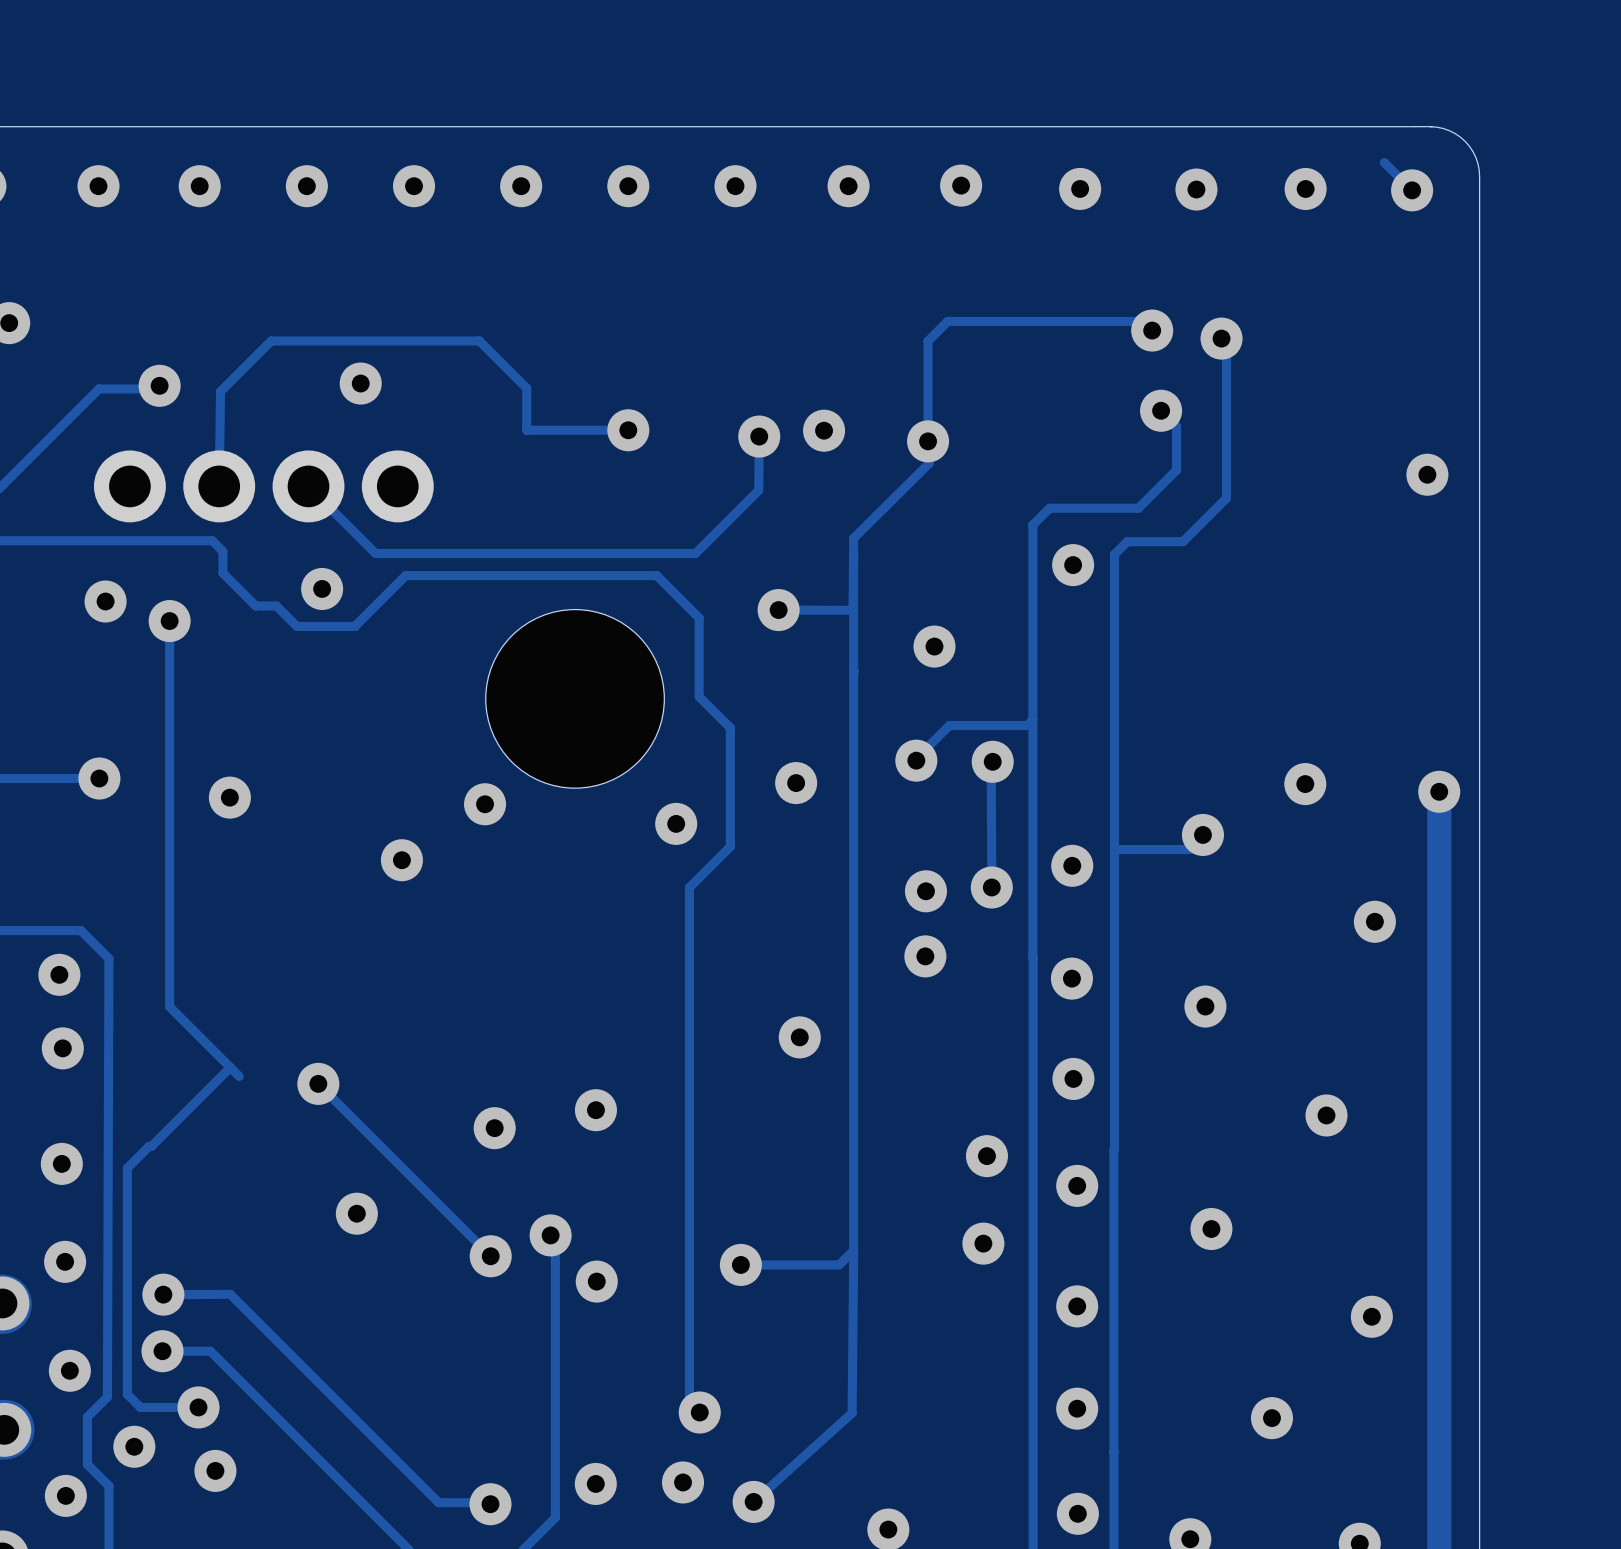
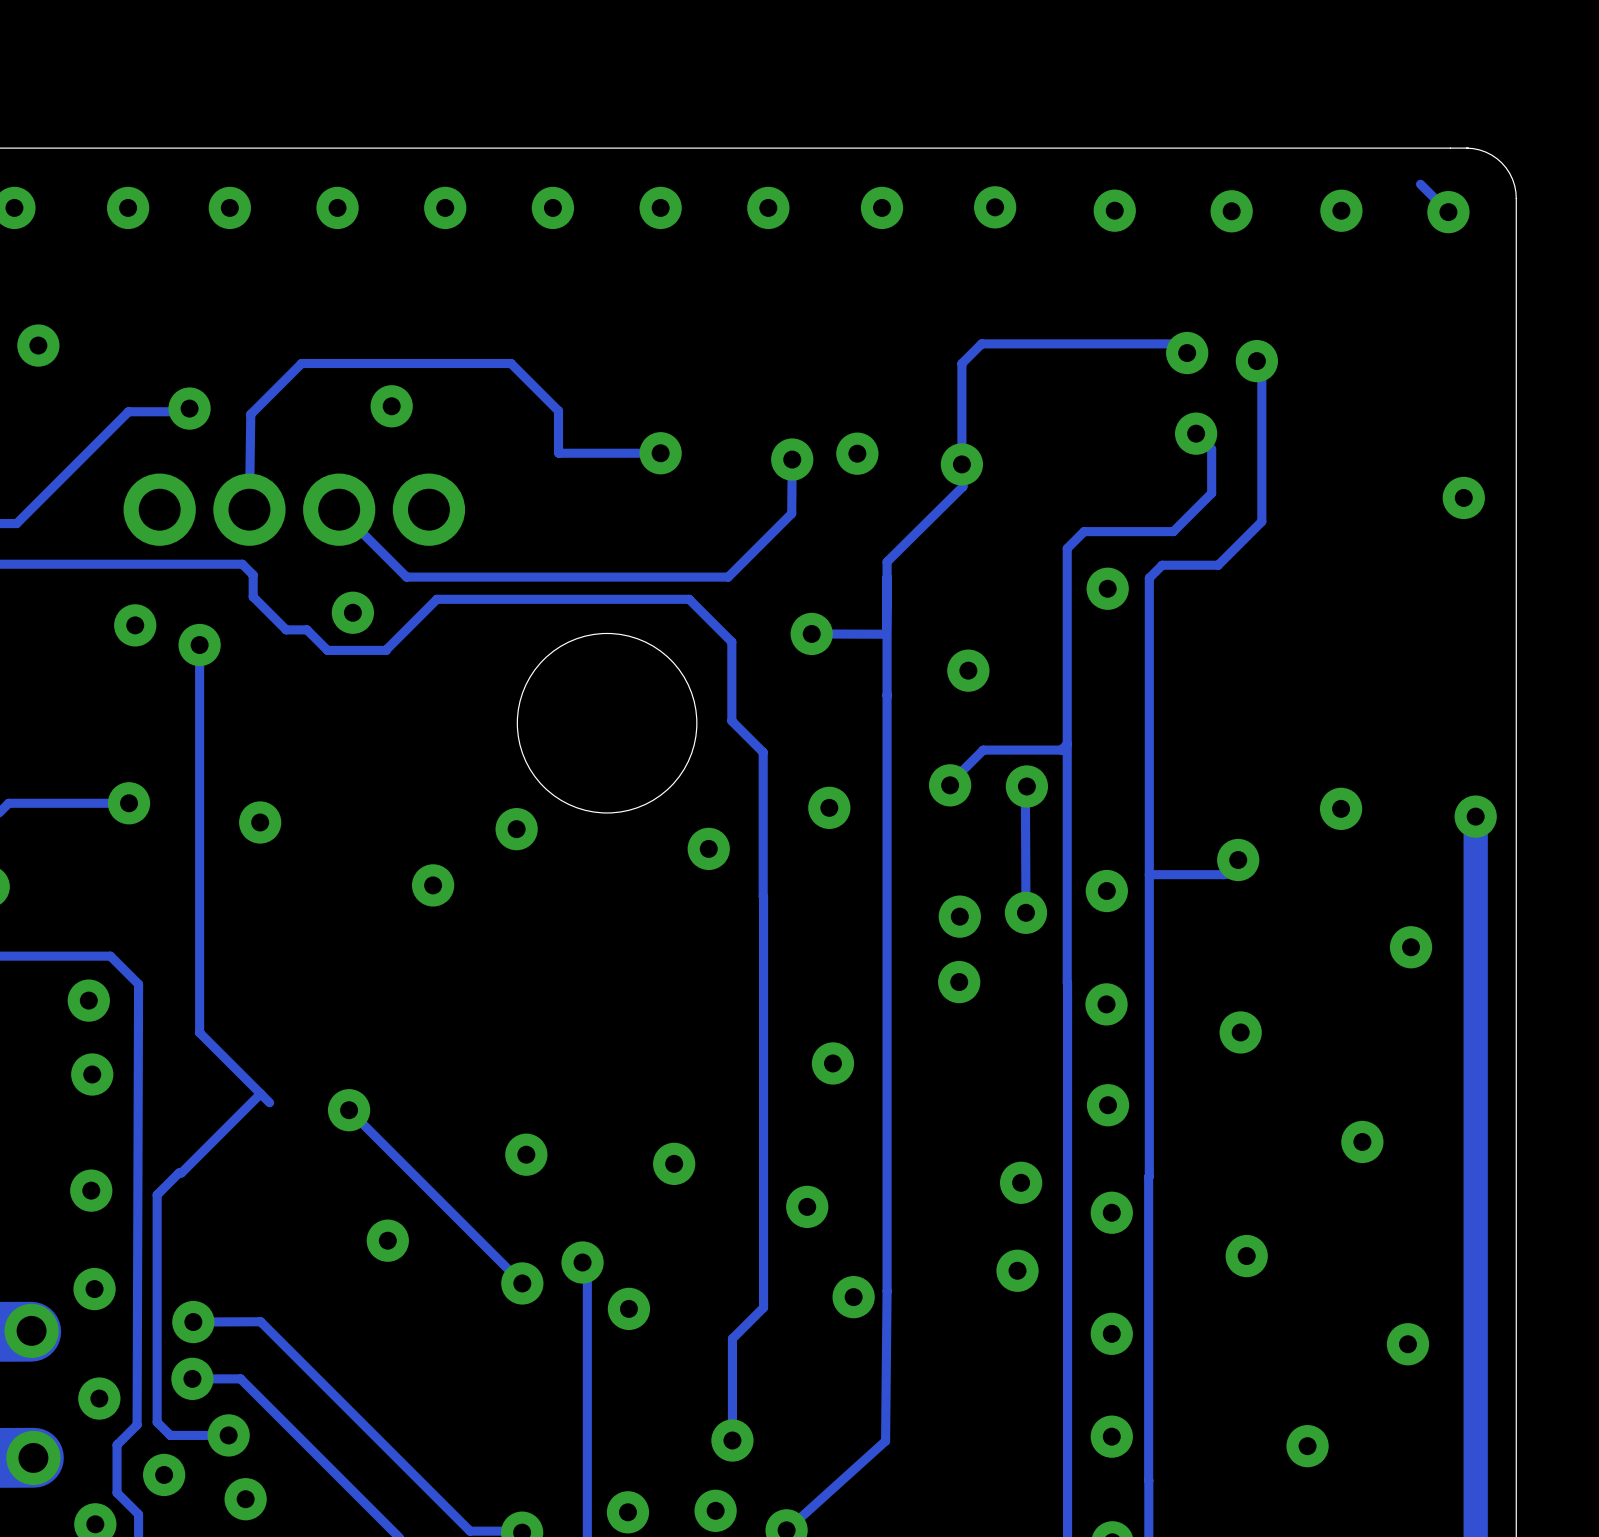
track: (730, 846) (689, 887) (689, 1402) (699, 1412) -> (763, 896) (763, 1307) (732, 1338) (732, 1440)
track: none -> (763, 871) (763, 896)
via position: (595, 1110) -> (674, 1163)
via: none -> (807, 1206)
track: (853, 1250) (839, 1264) (740, 1264) -> none
via: (740, 1264) -> none
via: none -> (853, 1297)

